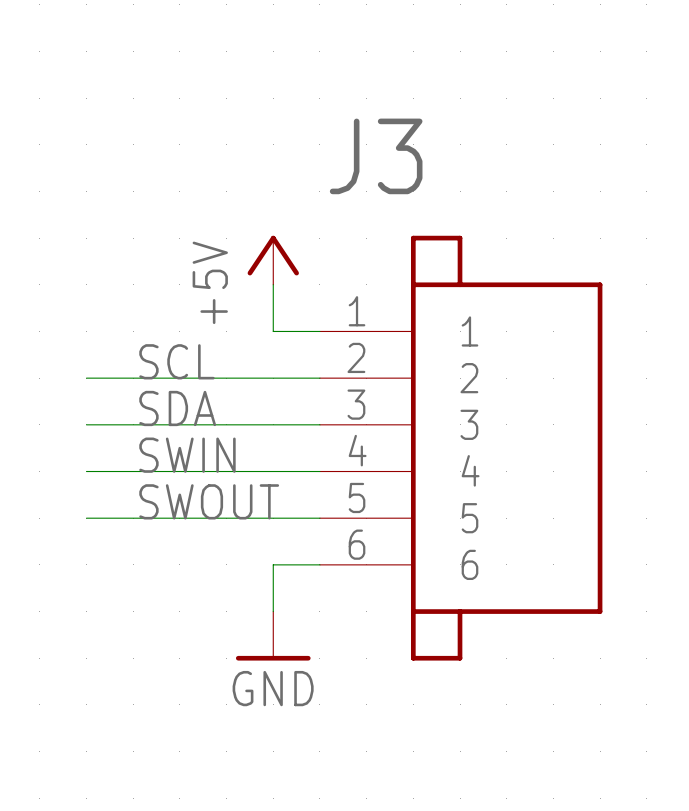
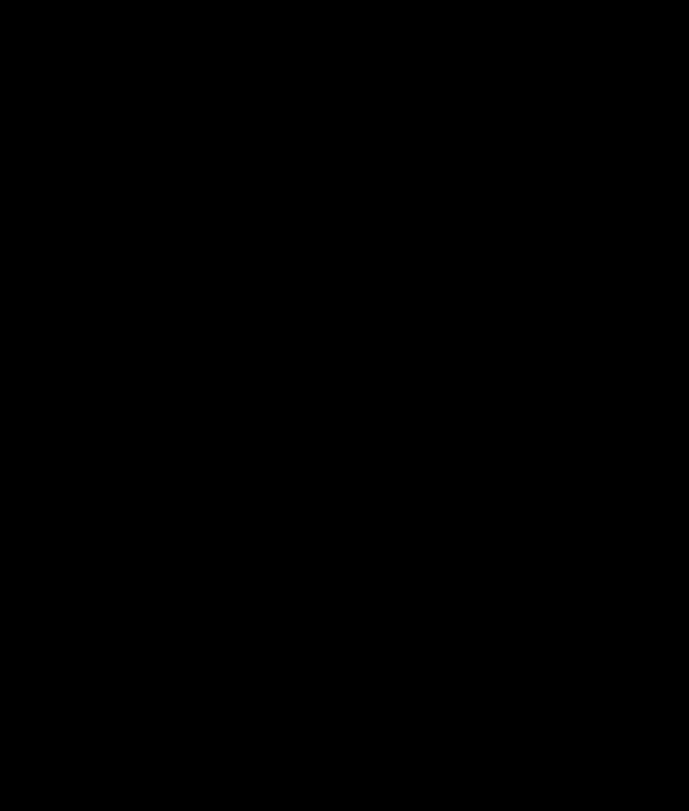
power symbol: +5V (273, 260) -> none
wire: (273, 284) (273, 331) (319, 331) -> none
label: SCL (176, 361) -> none
wire: (86, 378) (319, 378) -> none
label: SDA (177, 408) -> none
wire: (86, 424) (319, 424) -> none
J3: (461, 448) -> none
label: SWIN (187, 455) -> none
wire: (86, 471) (319, 471) -> none
label: SWOUT (209, 501) -> none
wire: (86, 518) (319, 518) -> none
wire: (319, 564) (273, 564) (273, 611) -> none
power symbol: GND (273, 636) -> none

